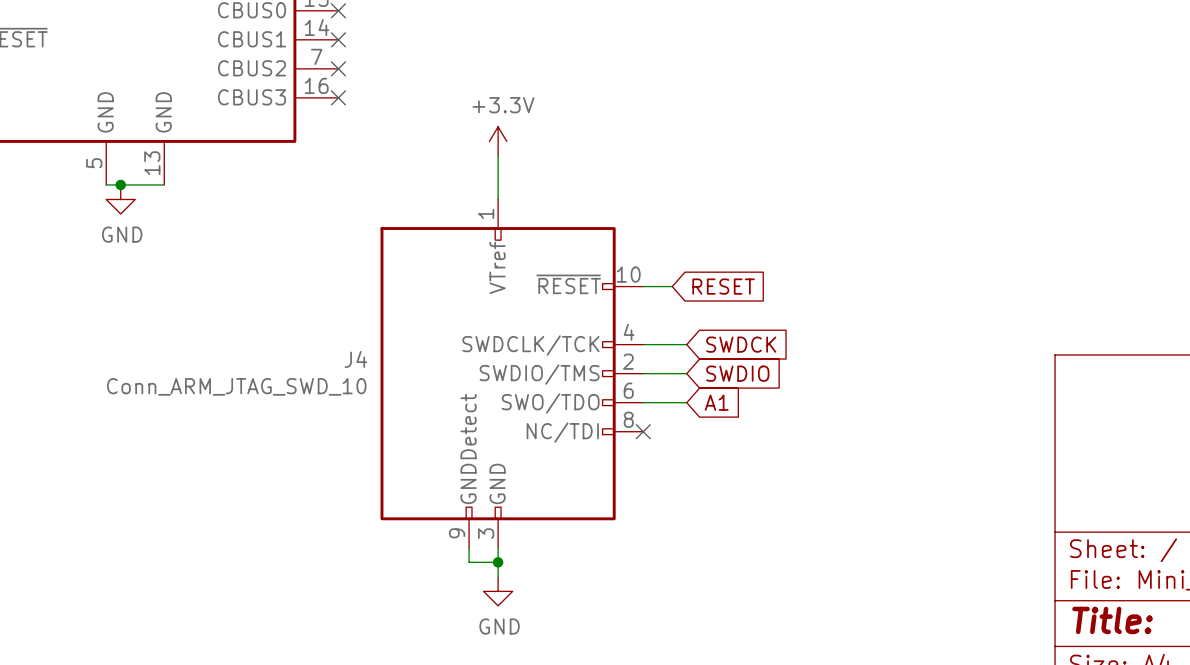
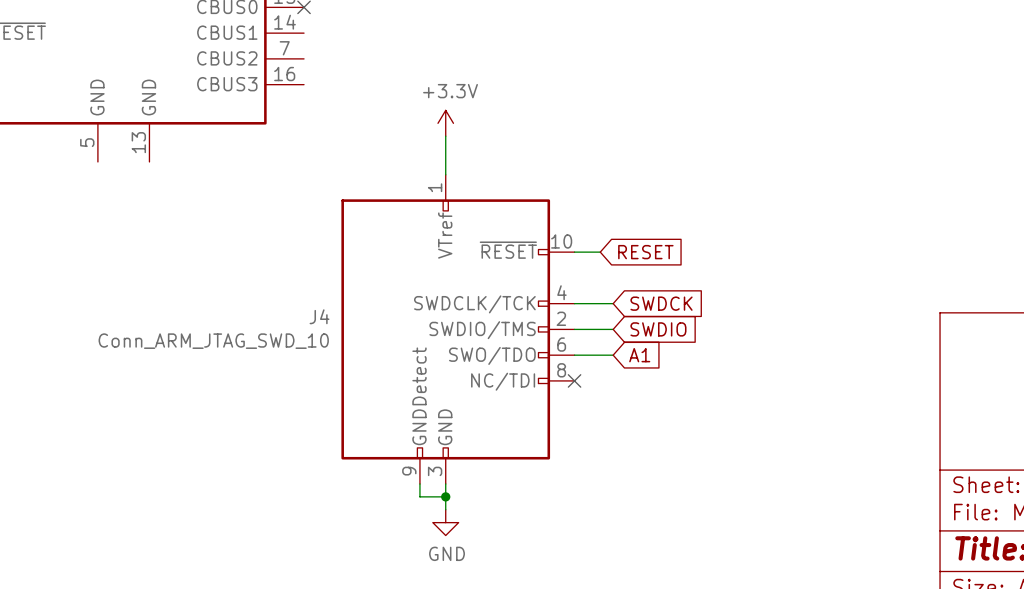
no-connect mark: (338, 39) -> none
no-connect mark: (338, 68) -> none
no-connect mark: (338, 97) -> none
wire: (106, 184) (164, 184) -> none
junction: (120, 184) -> none
power symbol: GND (120, 199) -> none

